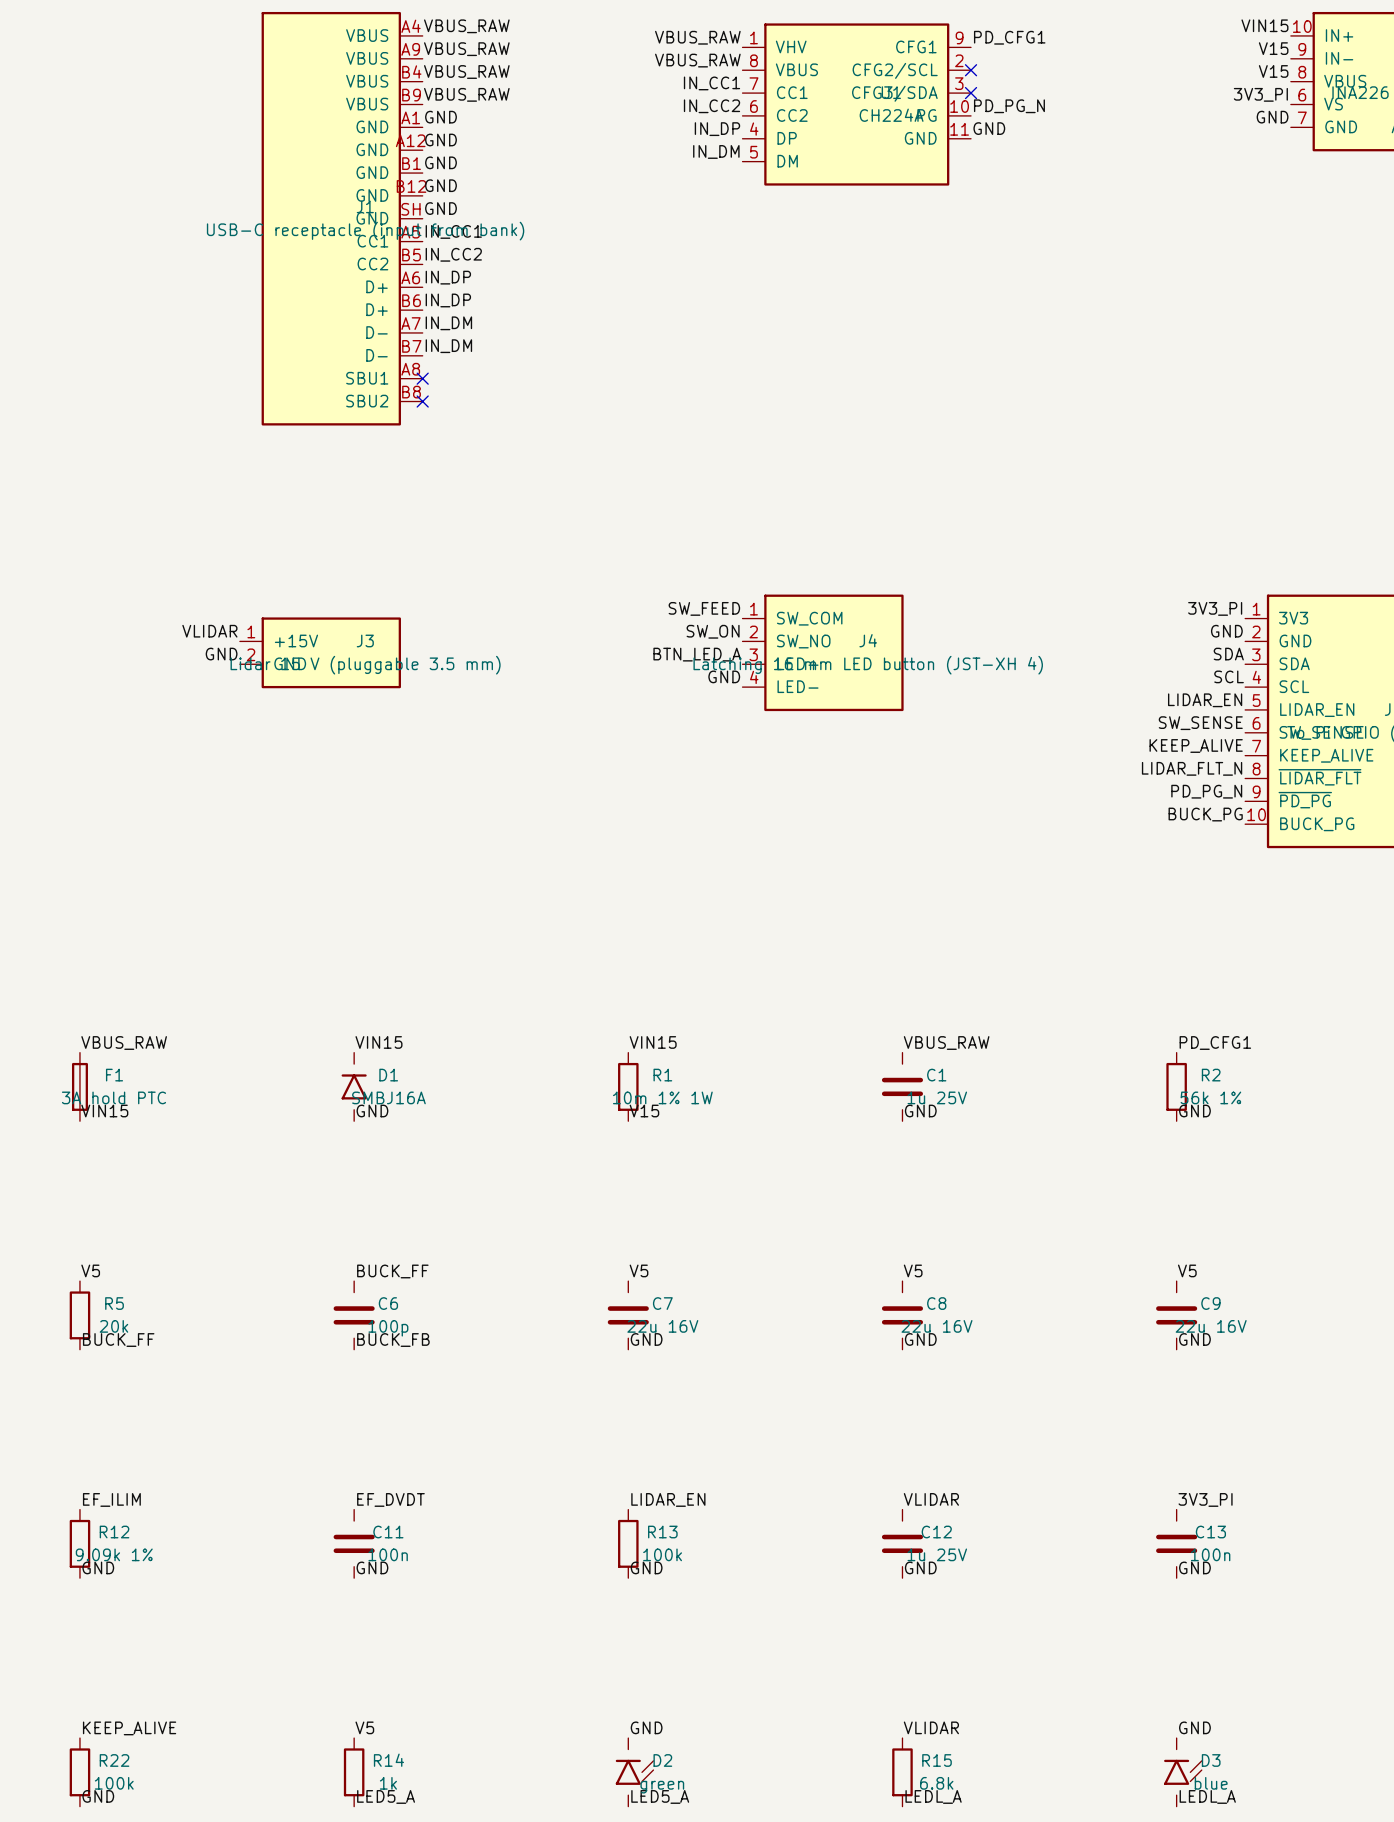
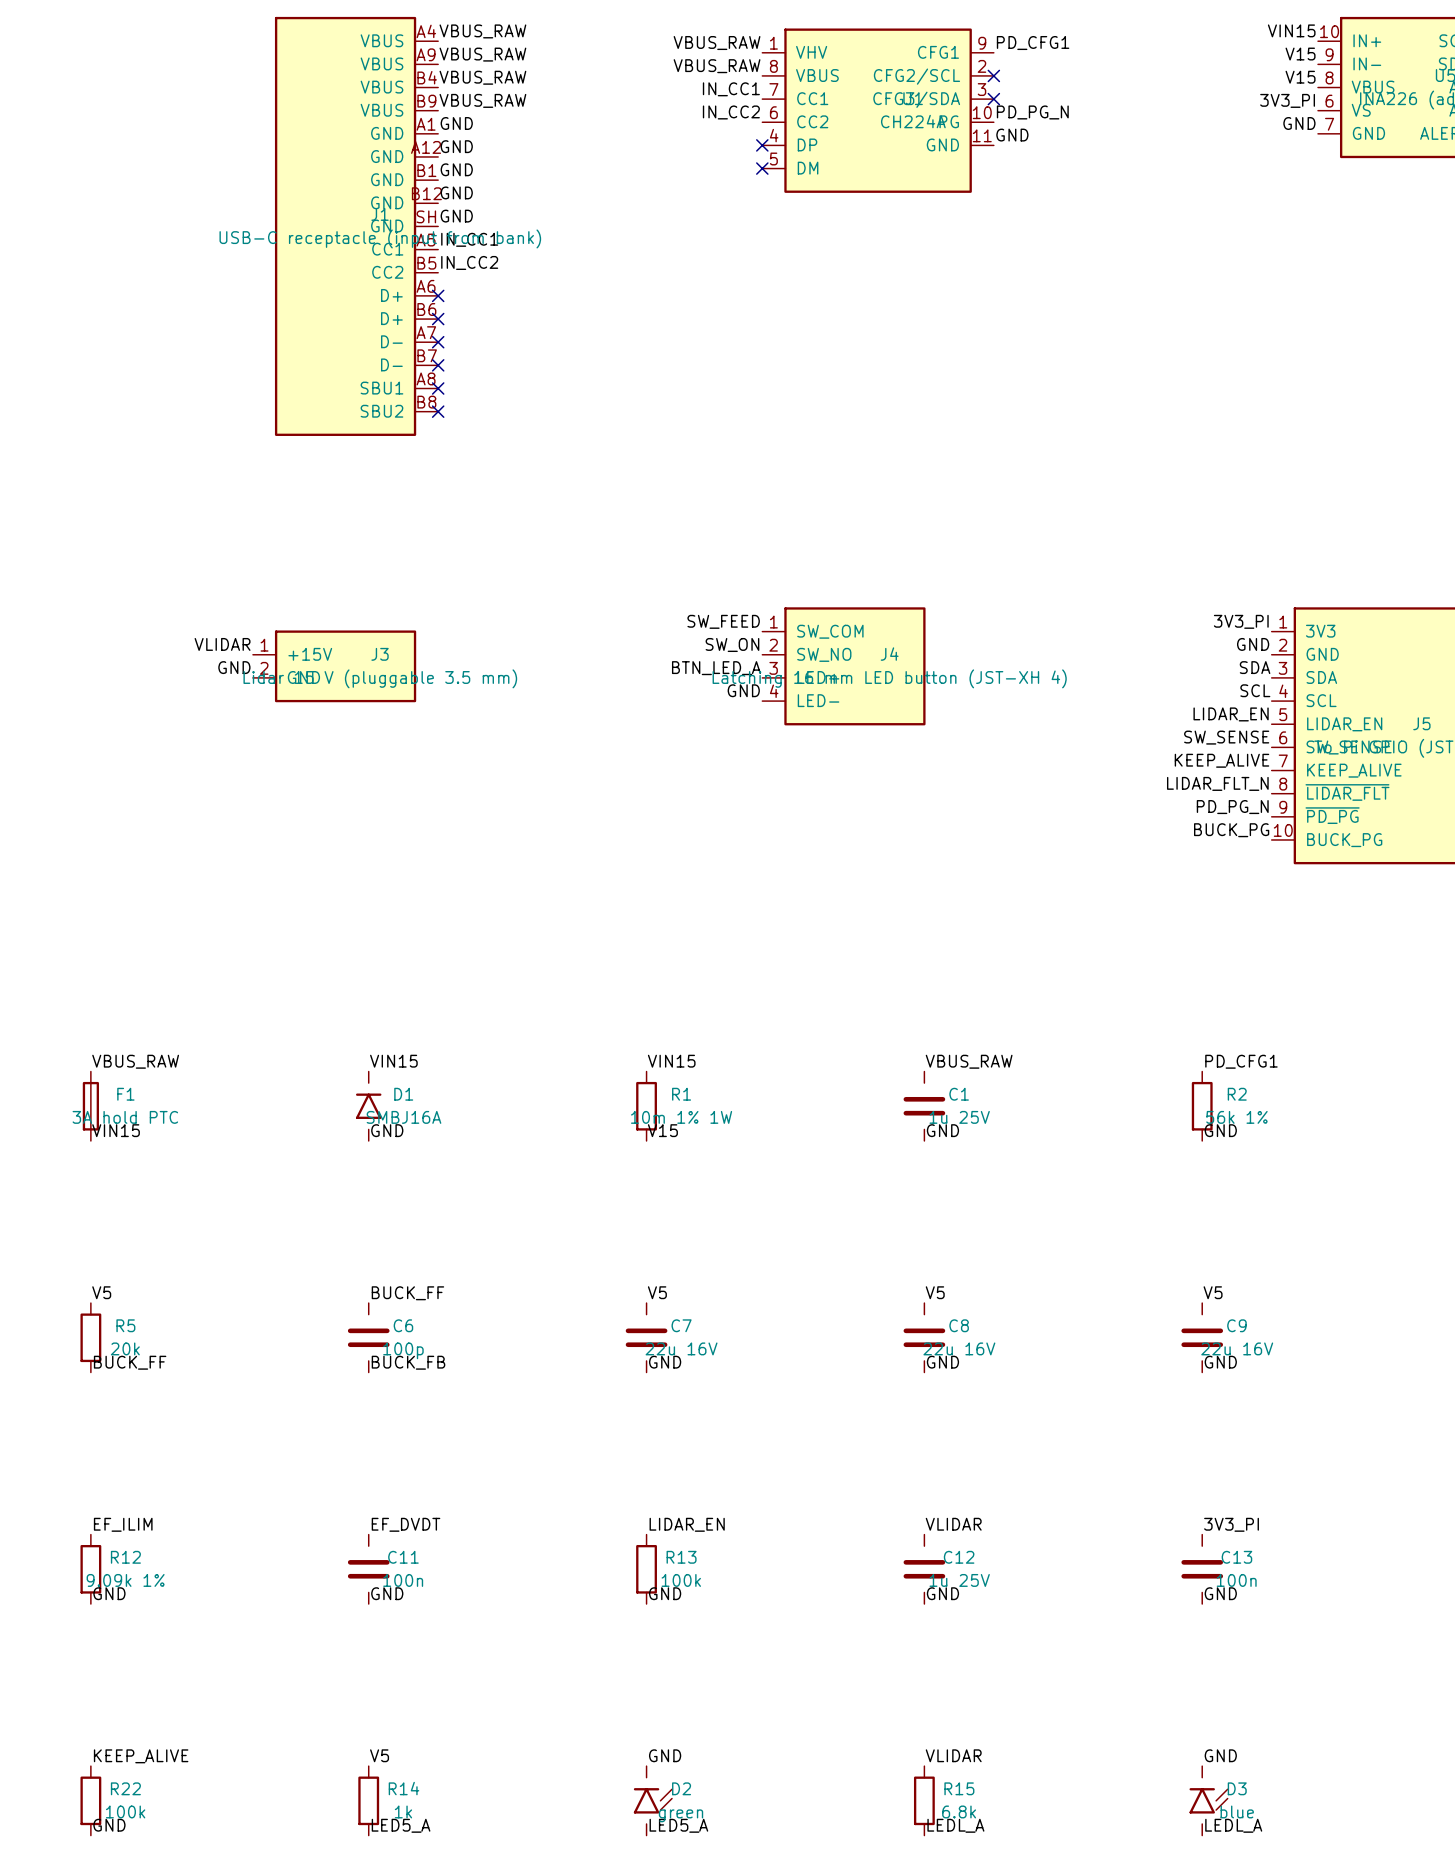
label: IN_DP (717, 129) -> none
no-connect mark: none -> (762, 145)
label: IN_DM (716, 151) -> none
no-connect mark: none -> (762, 168)
label: IN_DP (448, 277) -> none
no-connect mark: none -> (438, 295)
label: IN_DP (448, 300) -> none
no-connect mark: none -> (438, 319)
label: IN_DM (448, 323) -> none
no-connect mark: none -> (438, 342)
label: IN_DM (448, 346) -> none
no-connect mark: none -> (438, 365)

